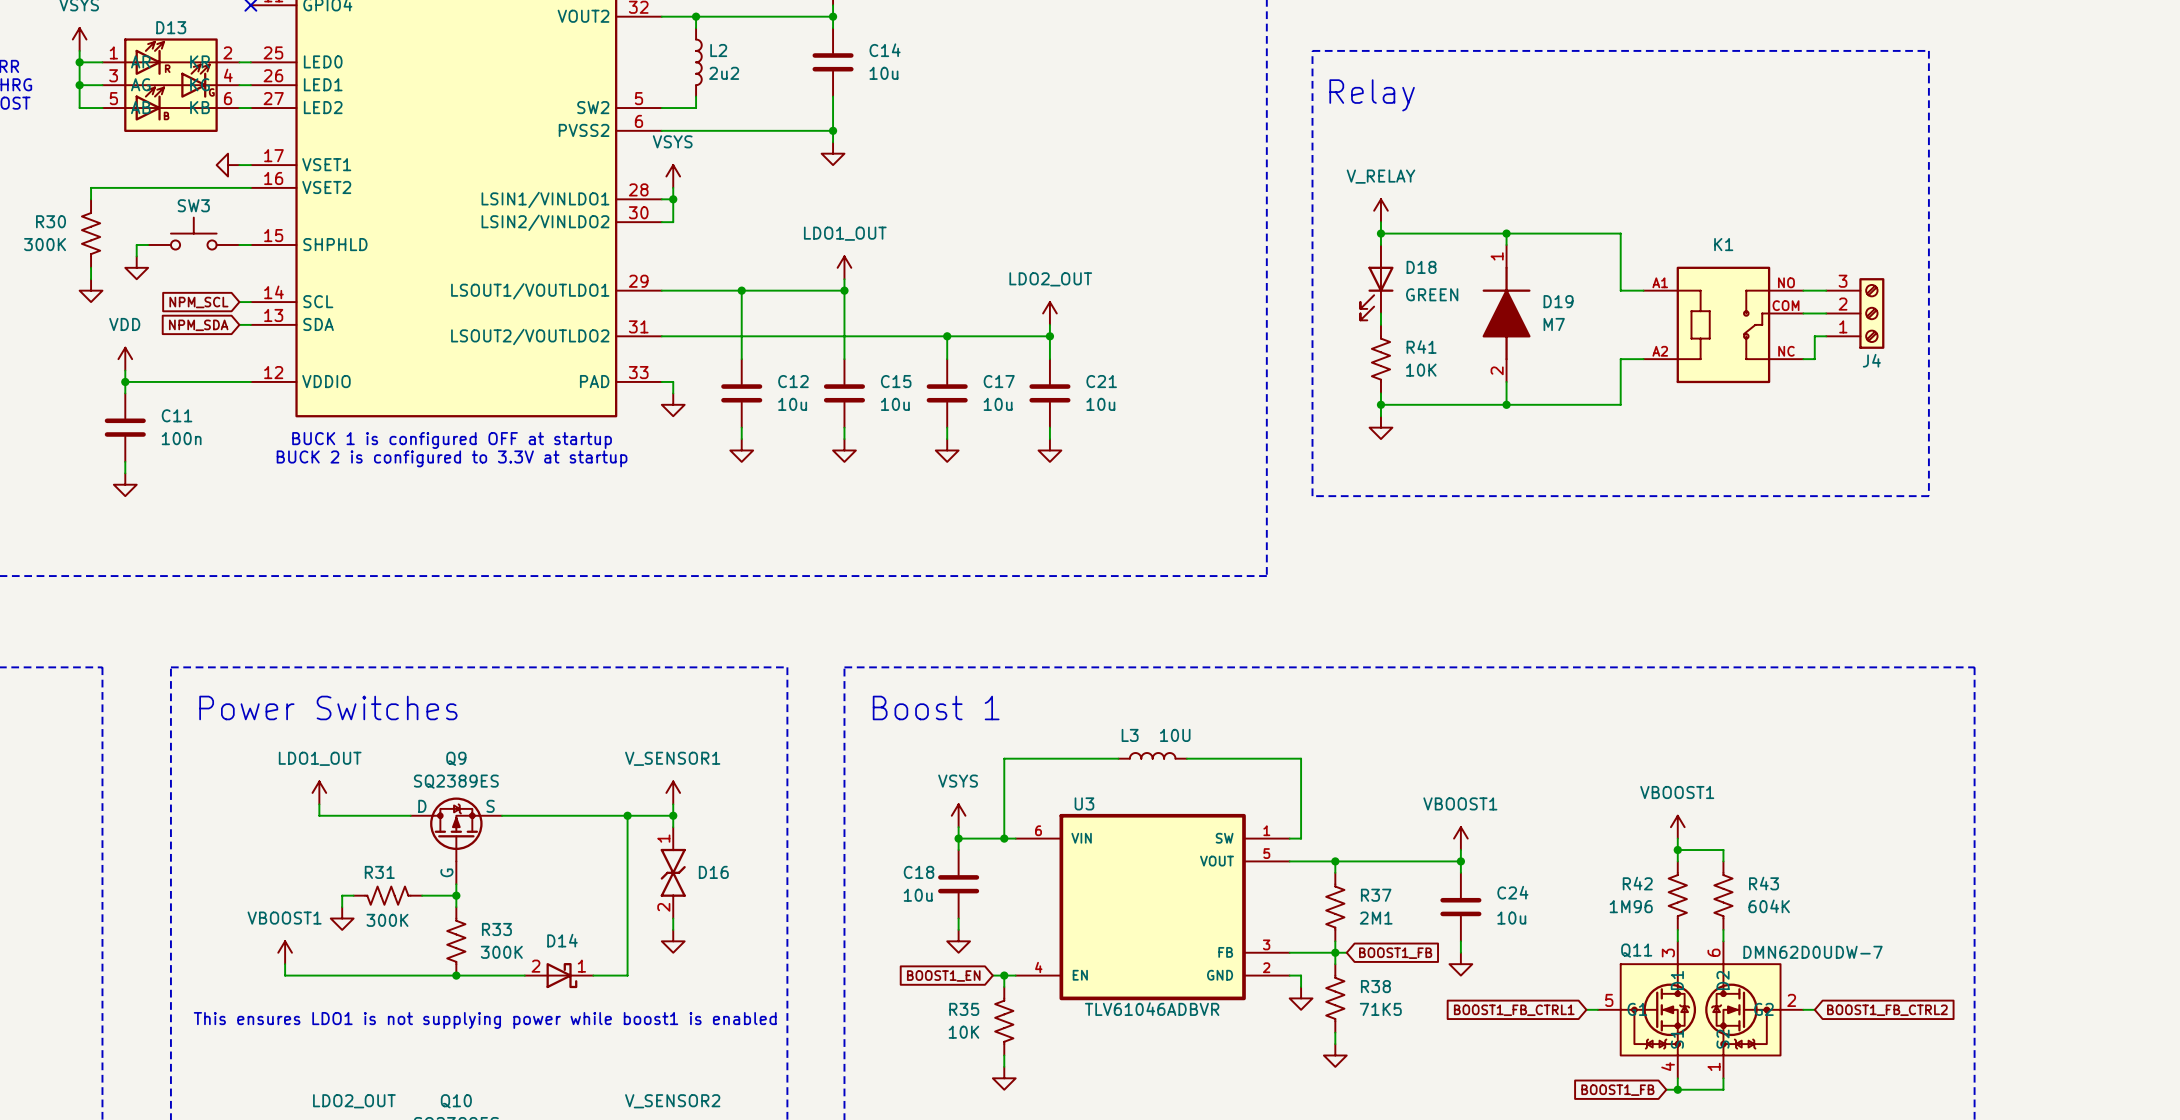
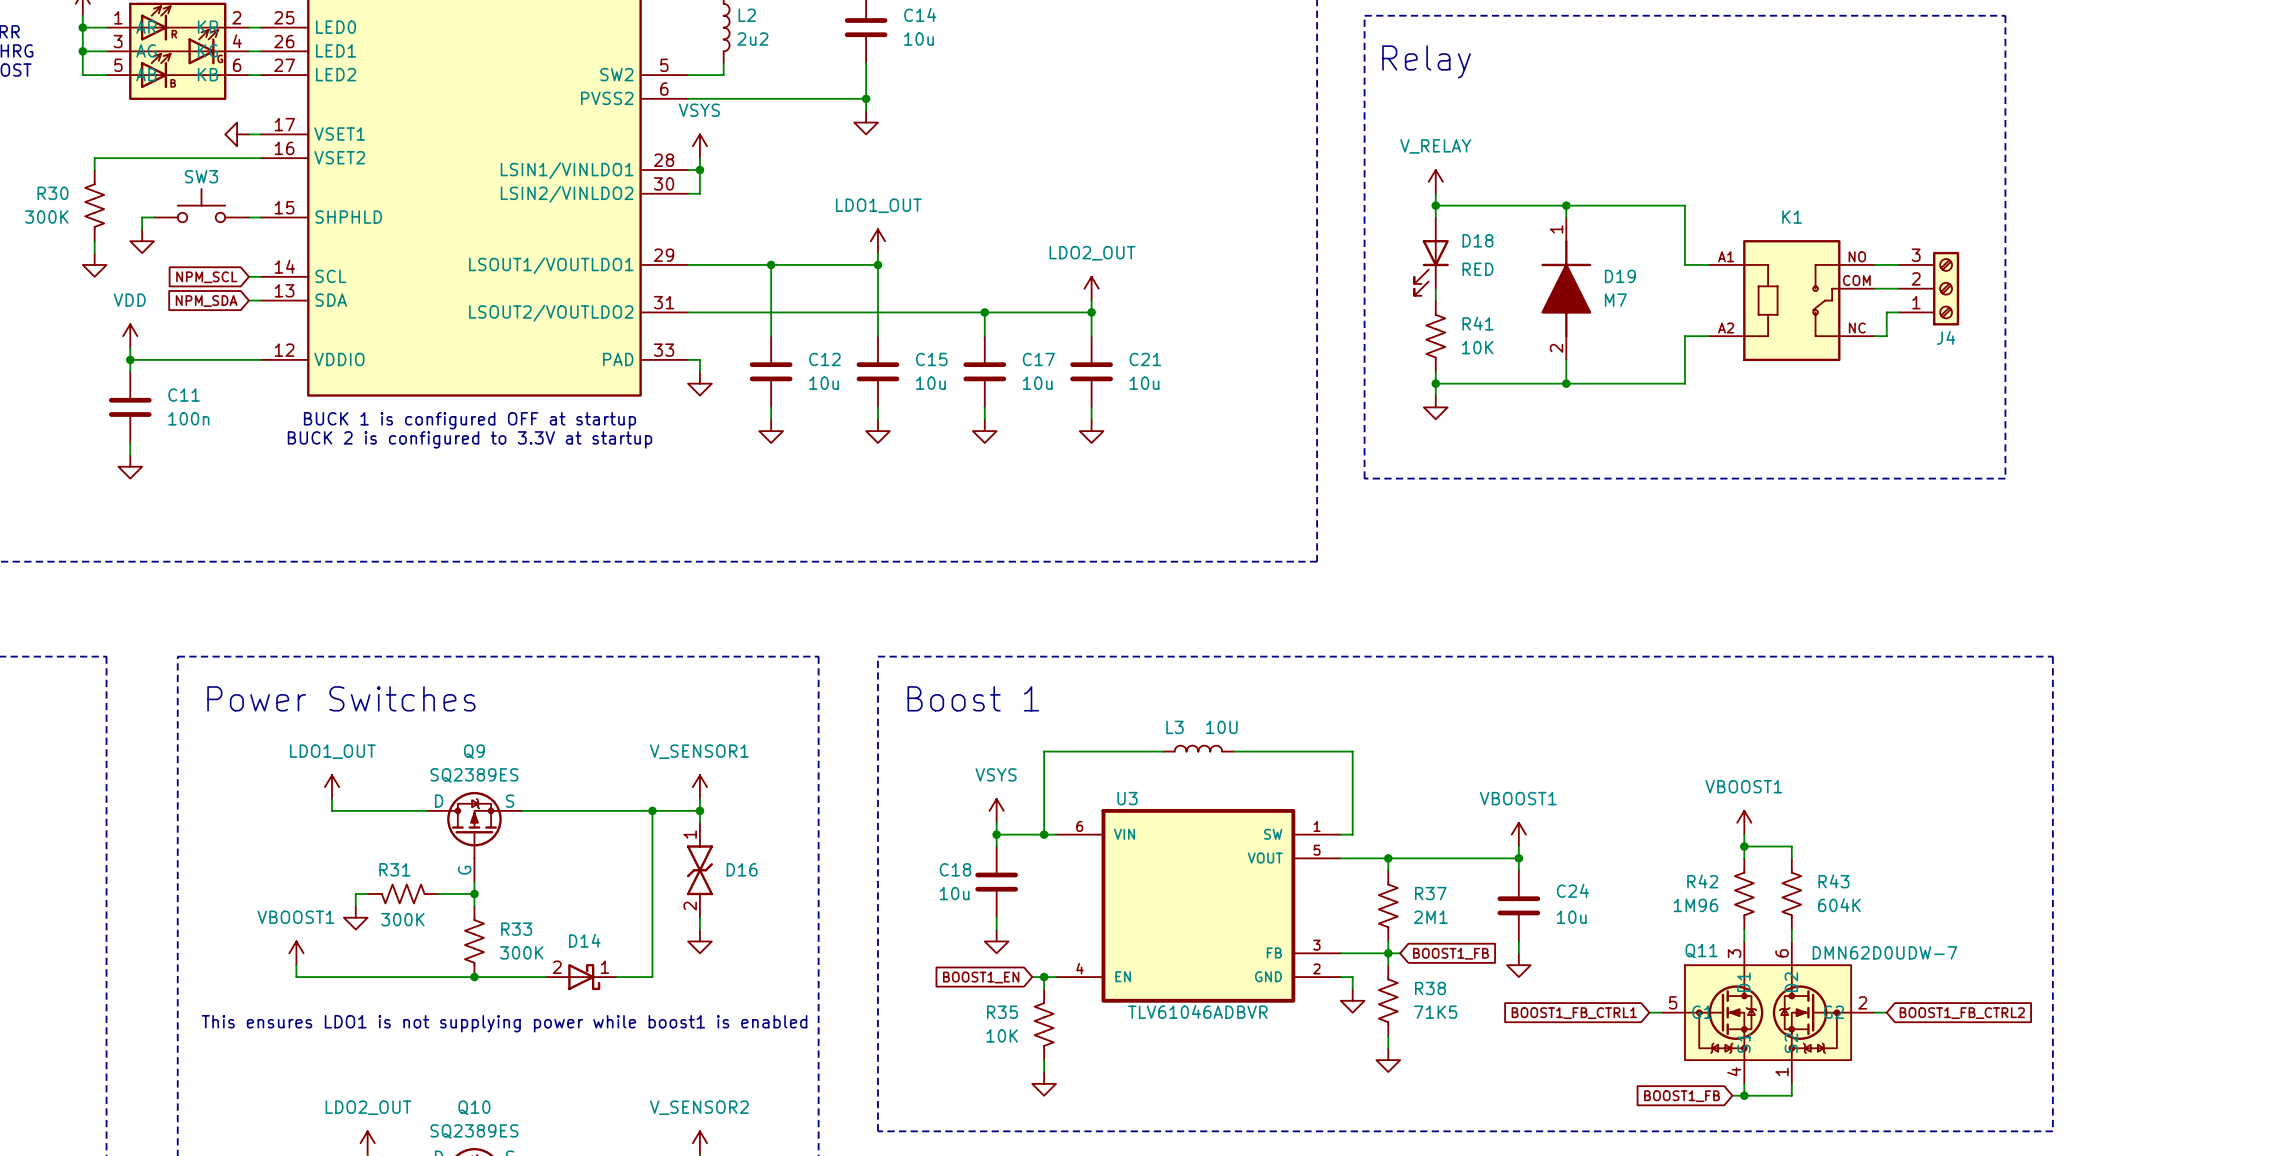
D18 value: GREEN (1432, 294) -> RED (1477, 269)

